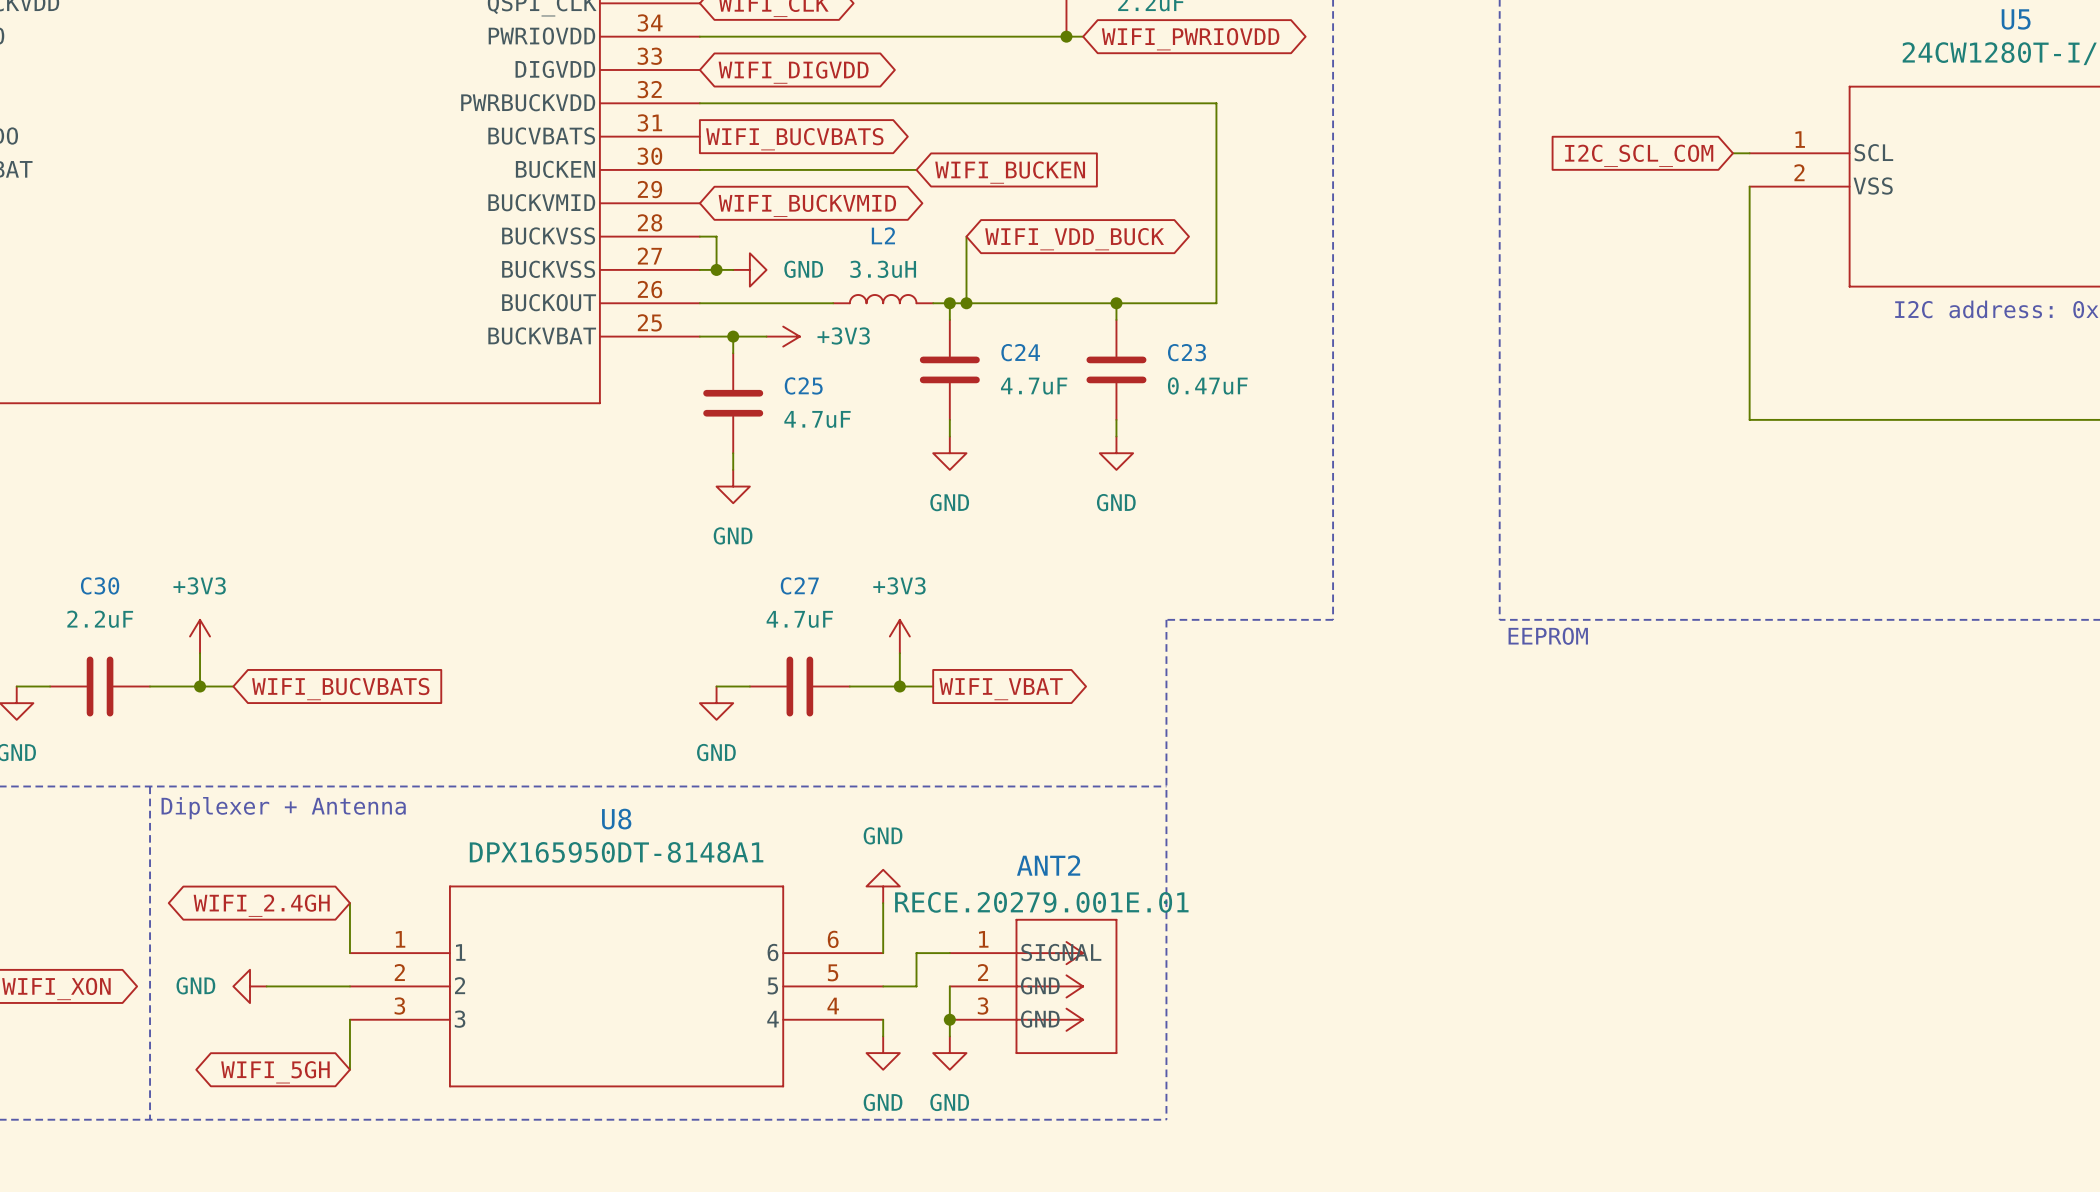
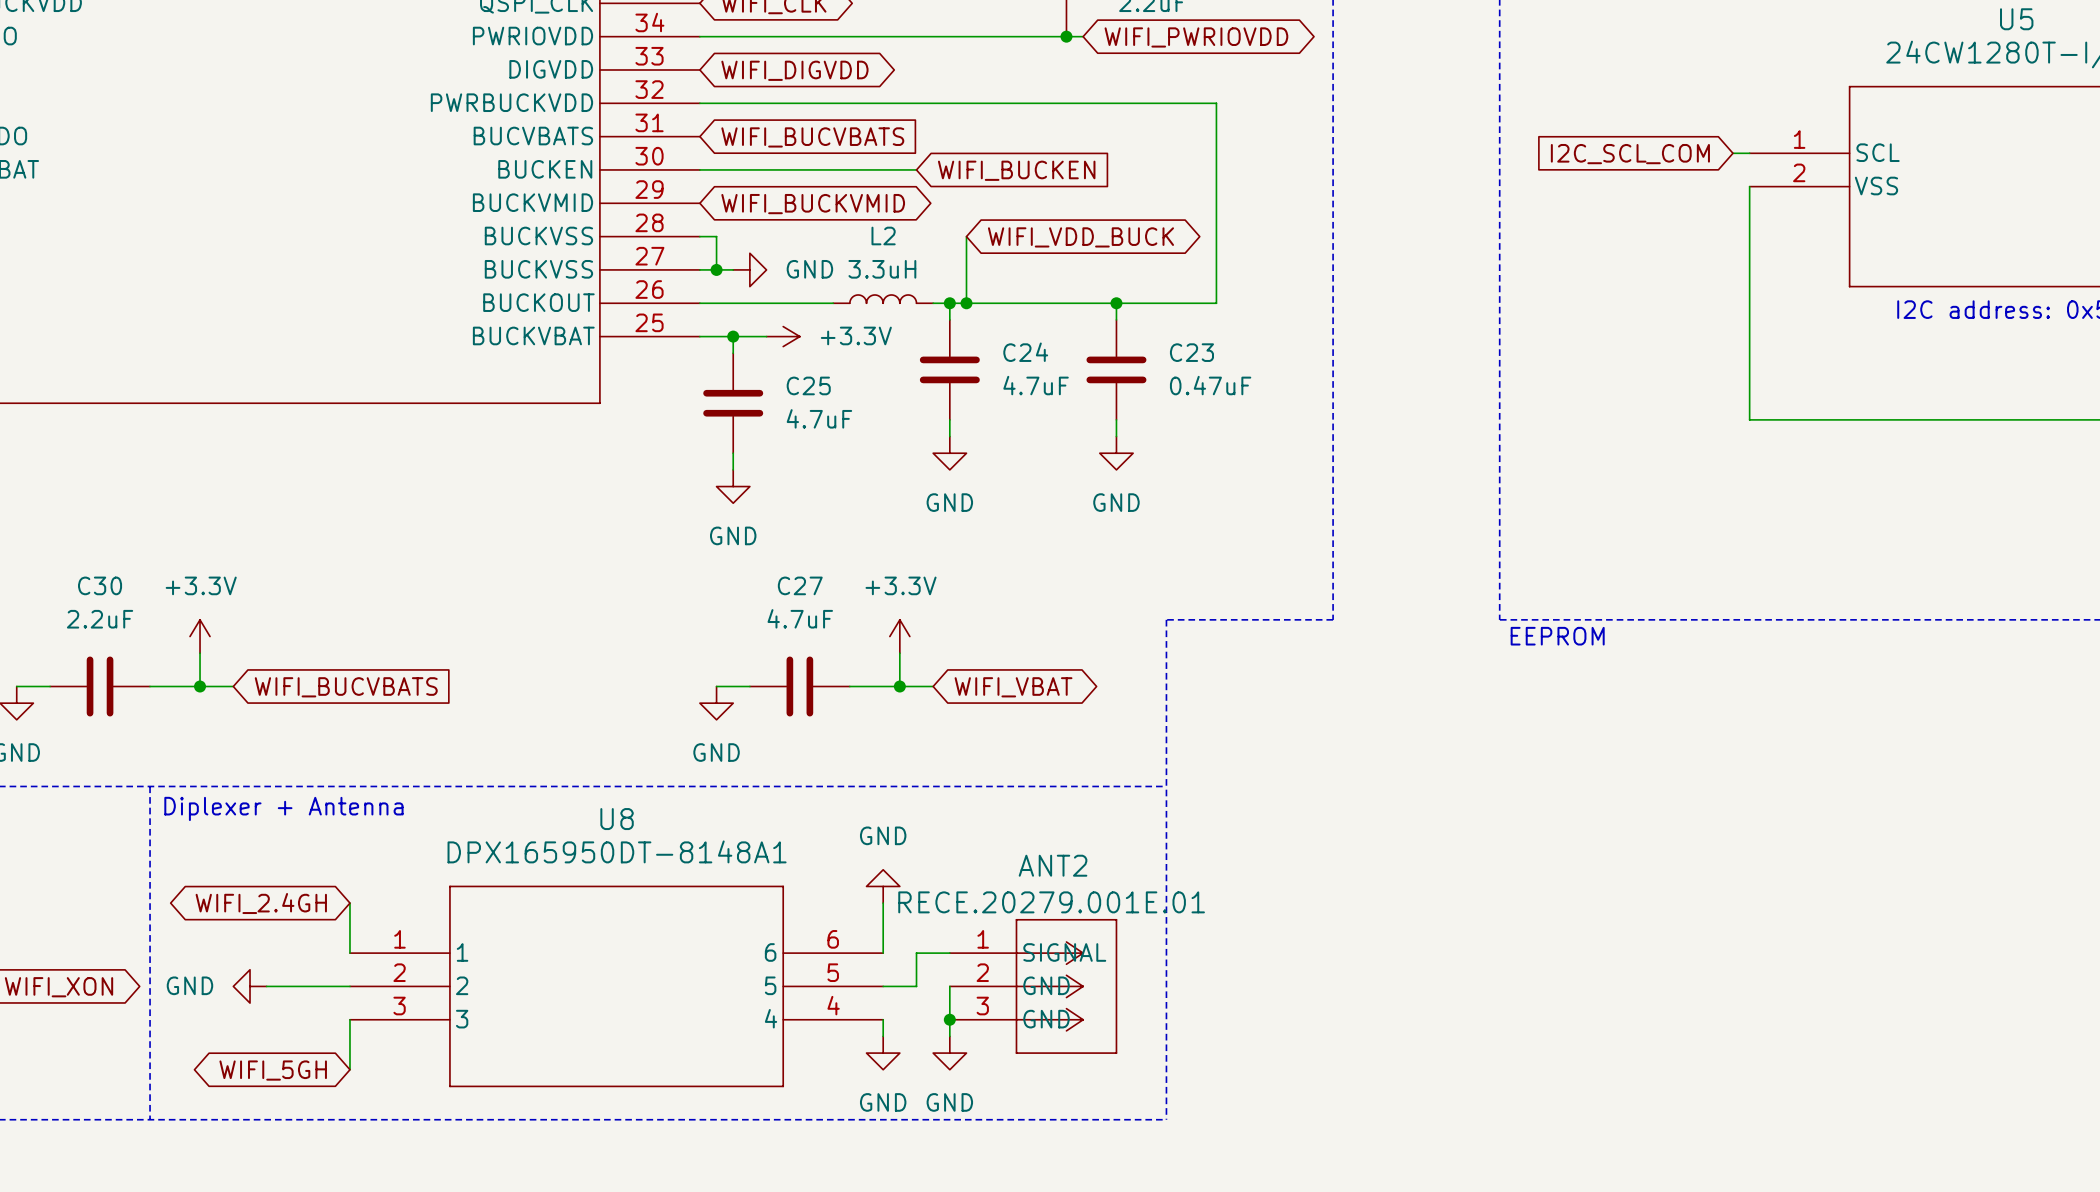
global label shape: output (794, 139) -> input (812, 137)
power symbol: +3V3 (783, 336) -> +3.3V (783, 336)
power symbol: +3V3 (200, 636) -> +3.3V (200, 636)
power symbol: +3V3 (899, 636) -> +3.3V (899, 636)
global label shape: output (1001, 689) -> bidirectional (1013, 687)

